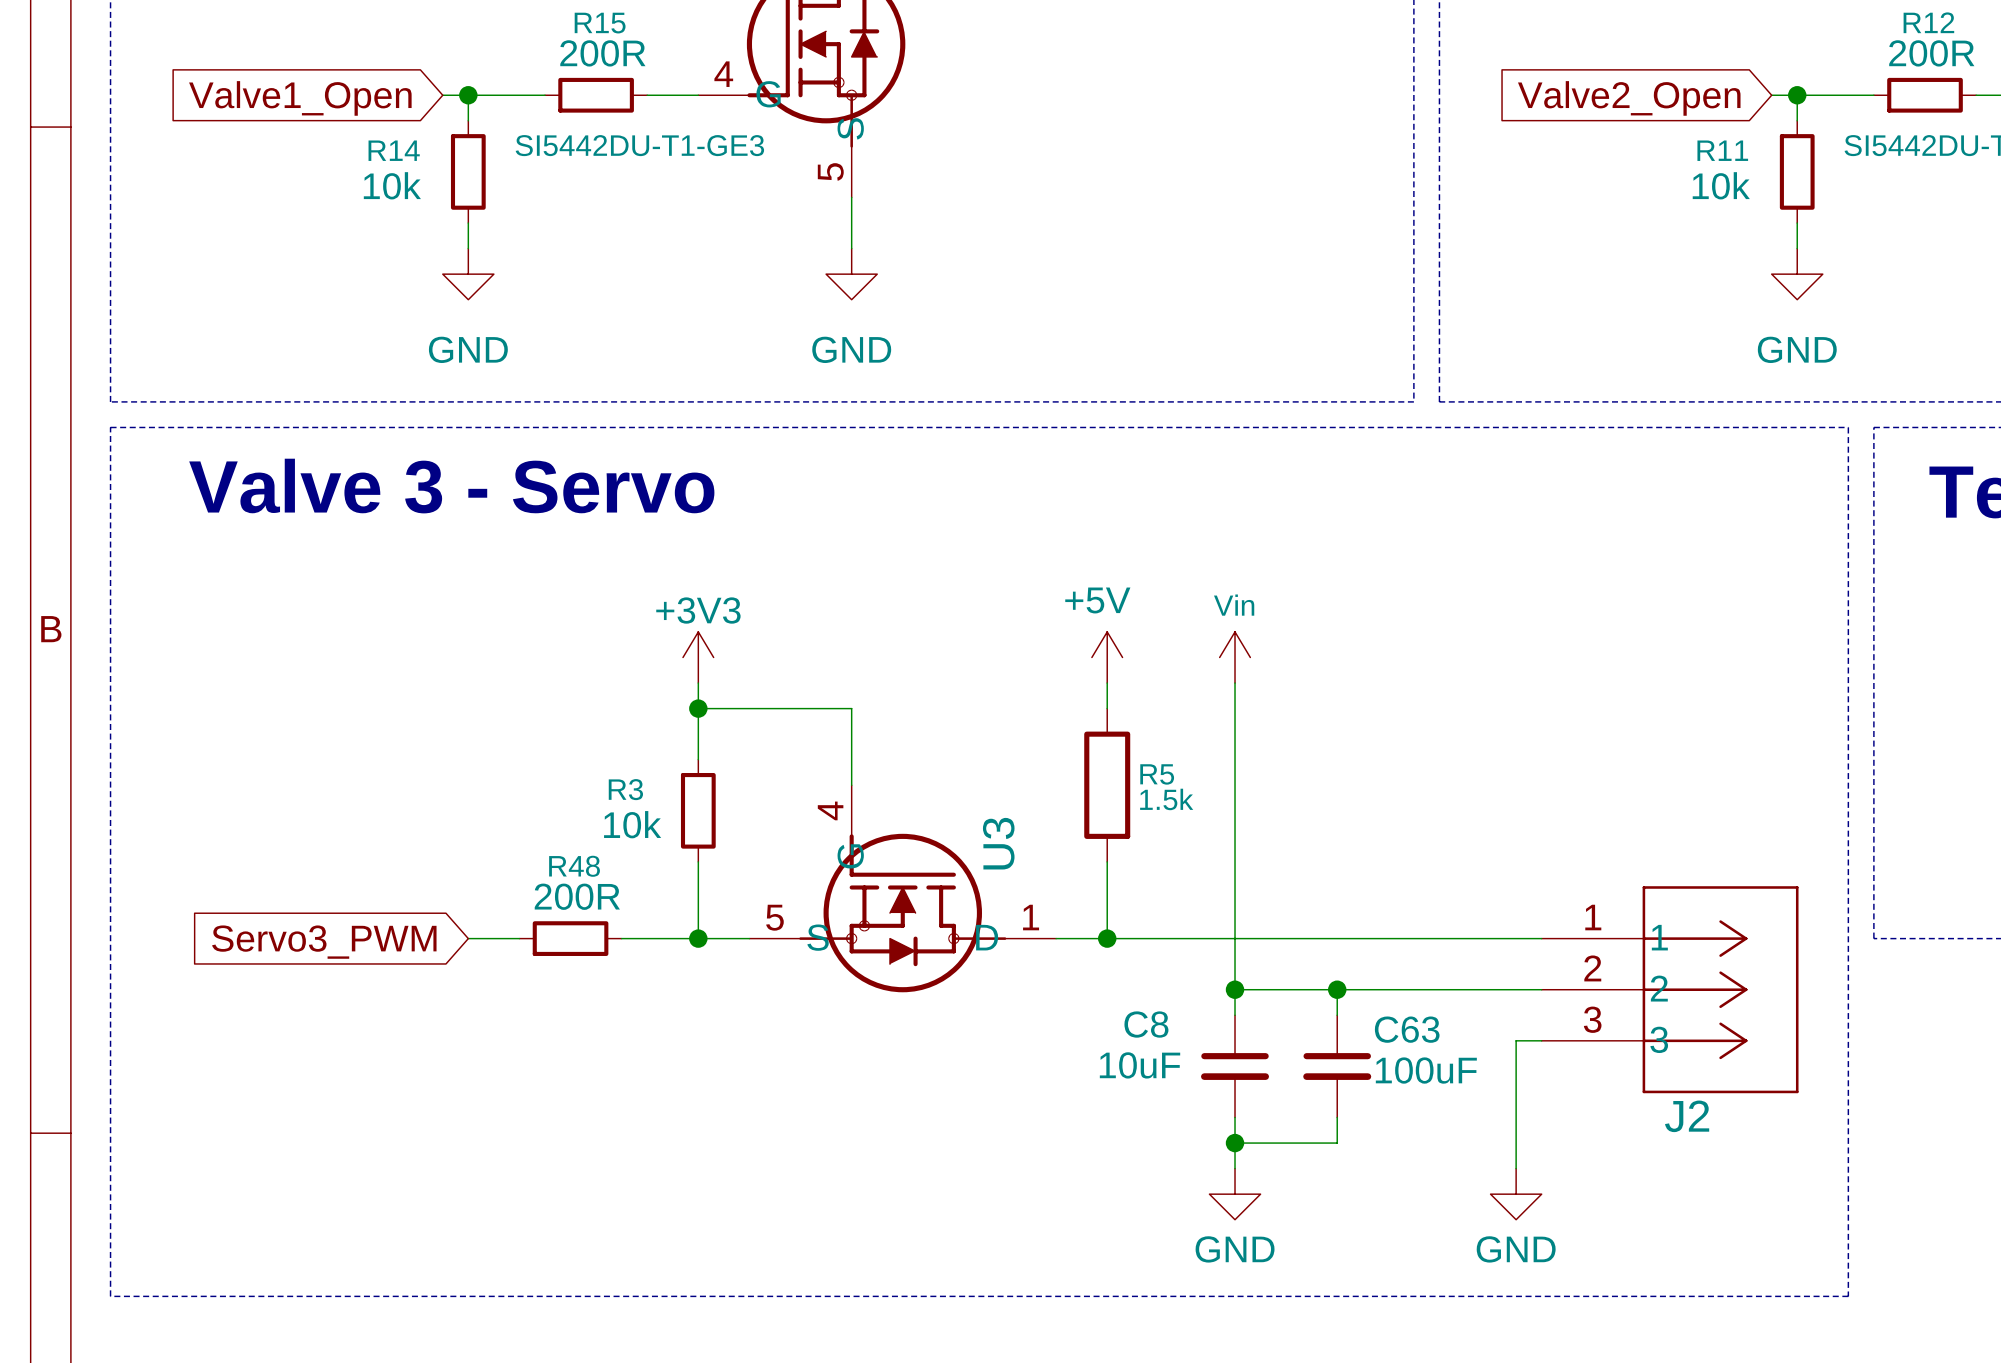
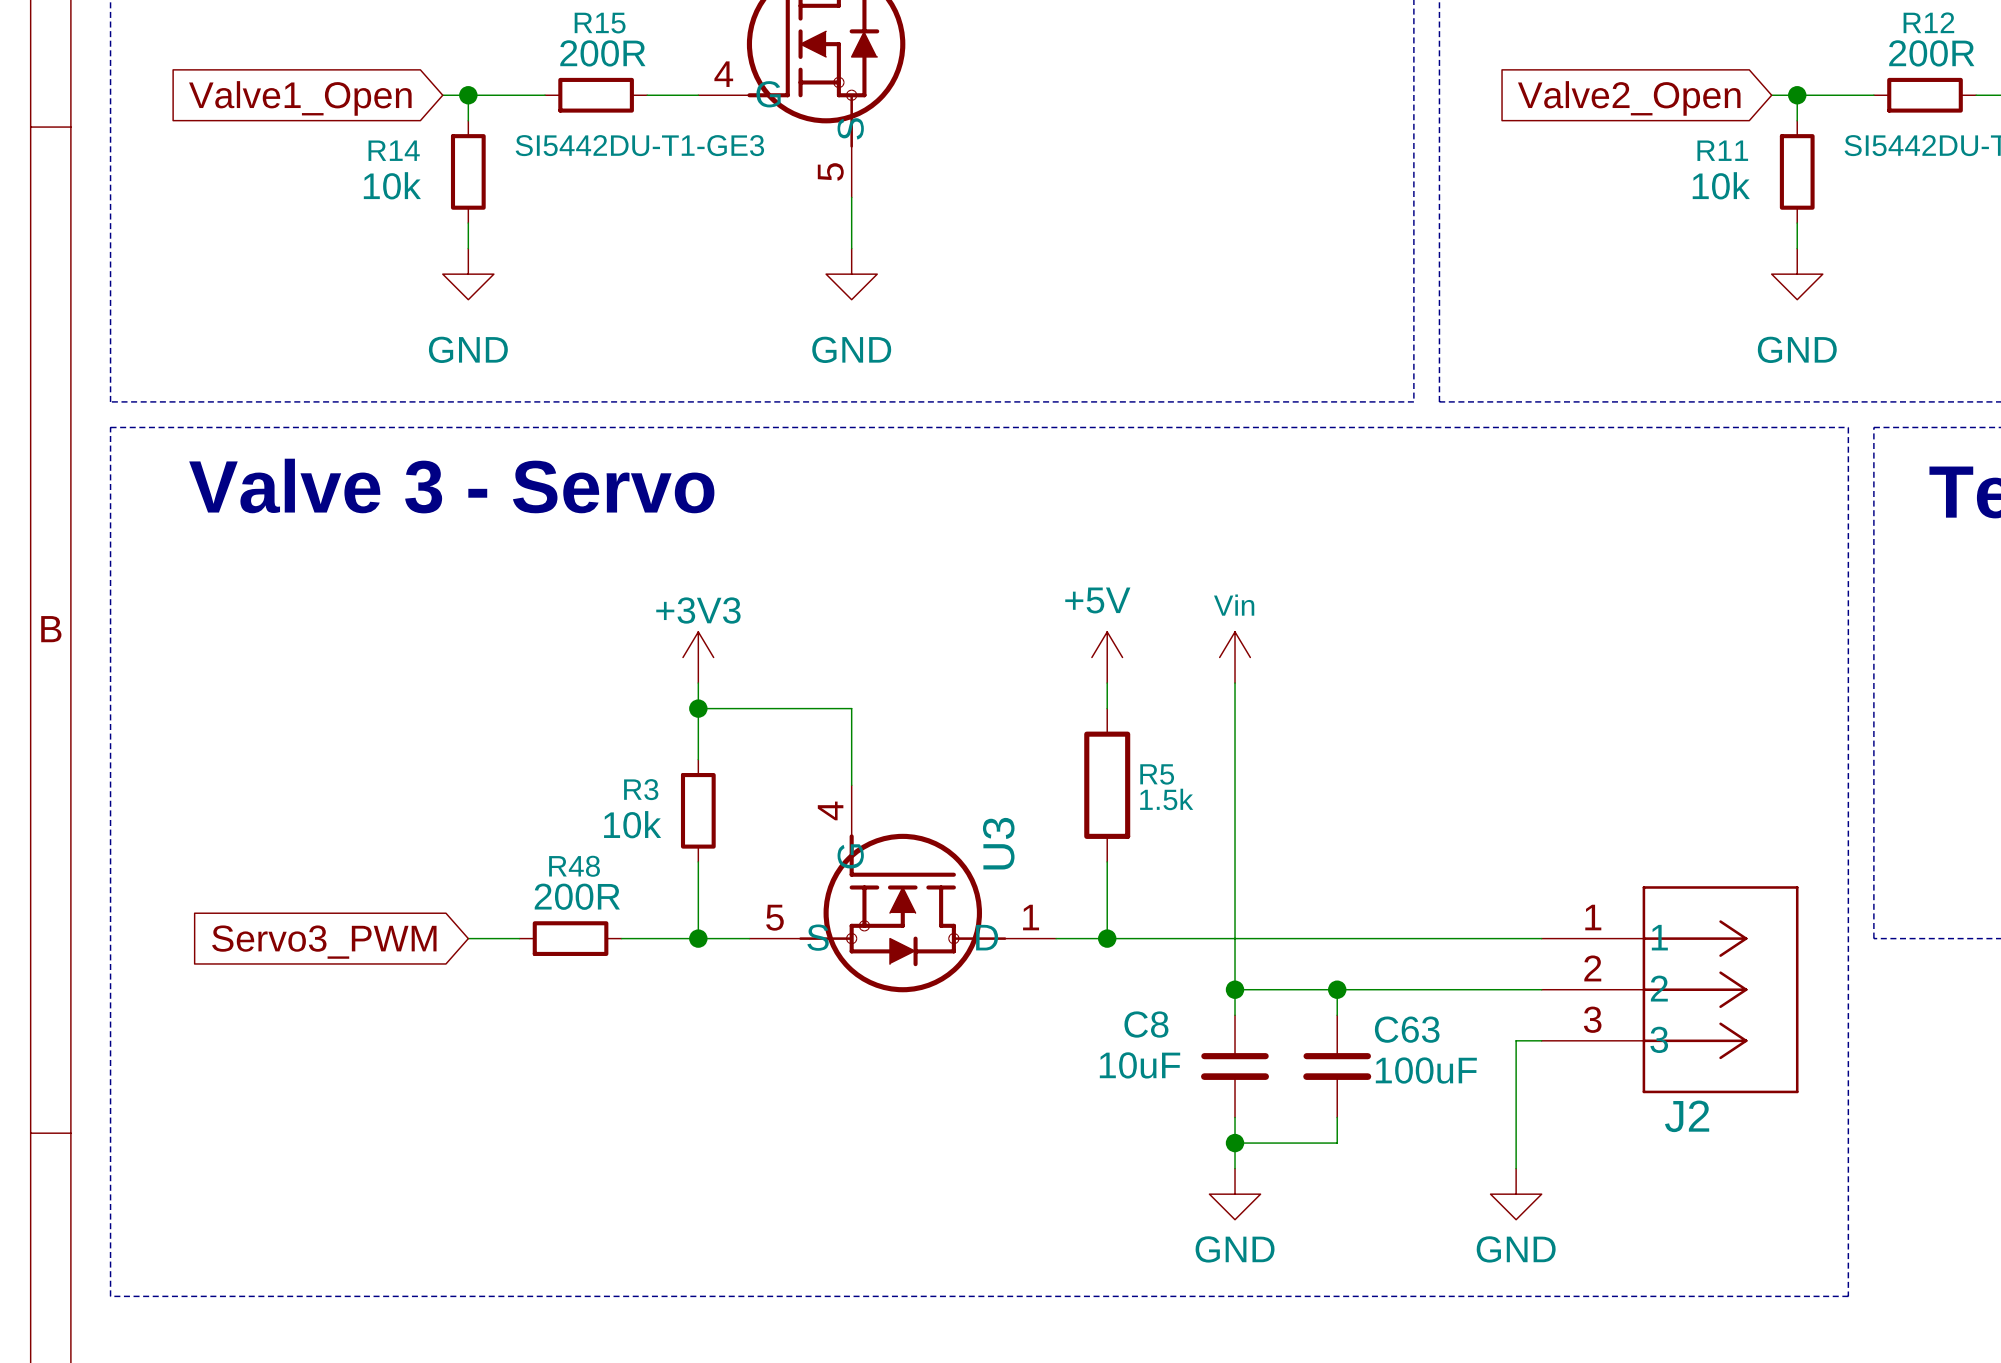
R3 name position: R3 (625, 789) -> R3 (641, 789)

